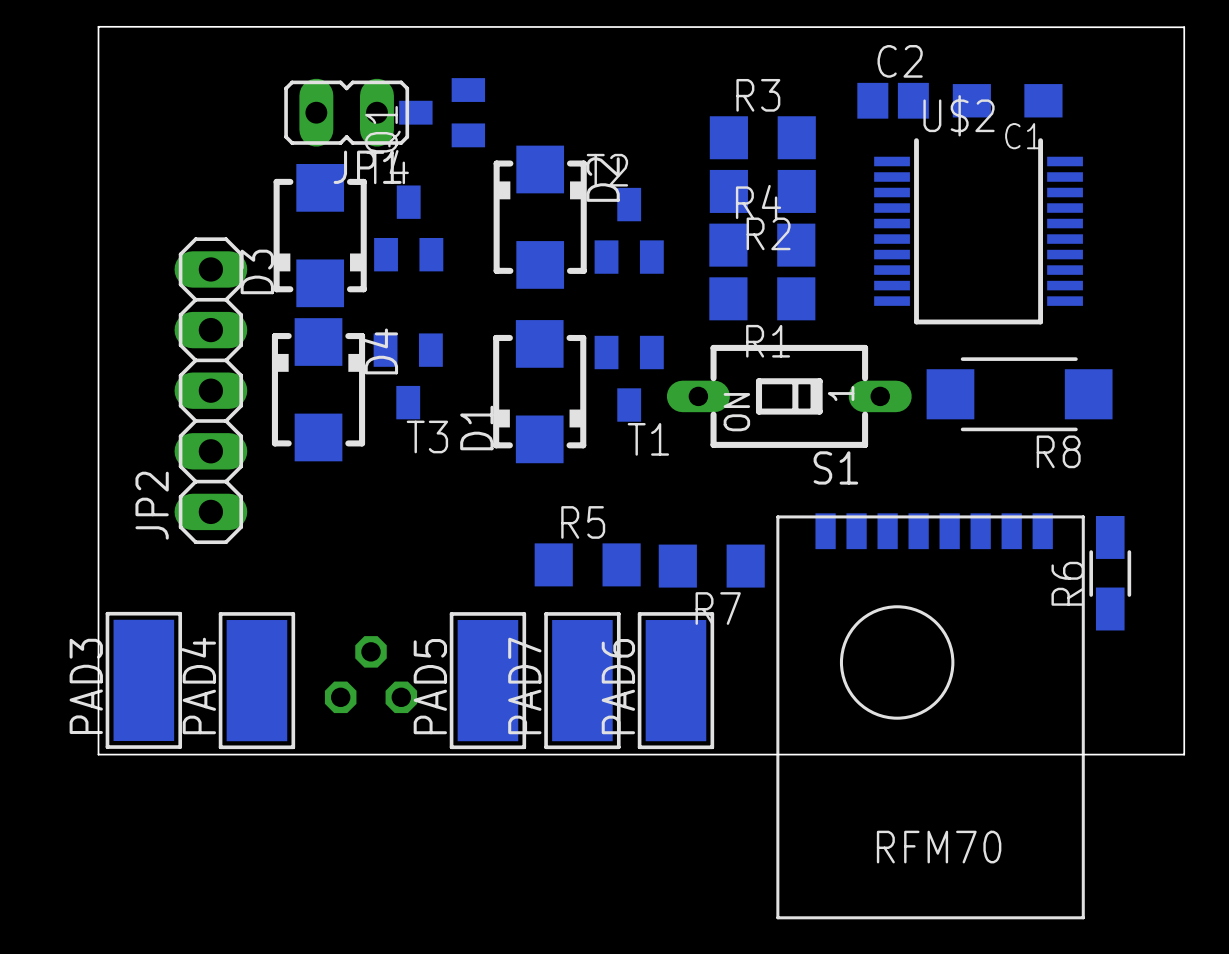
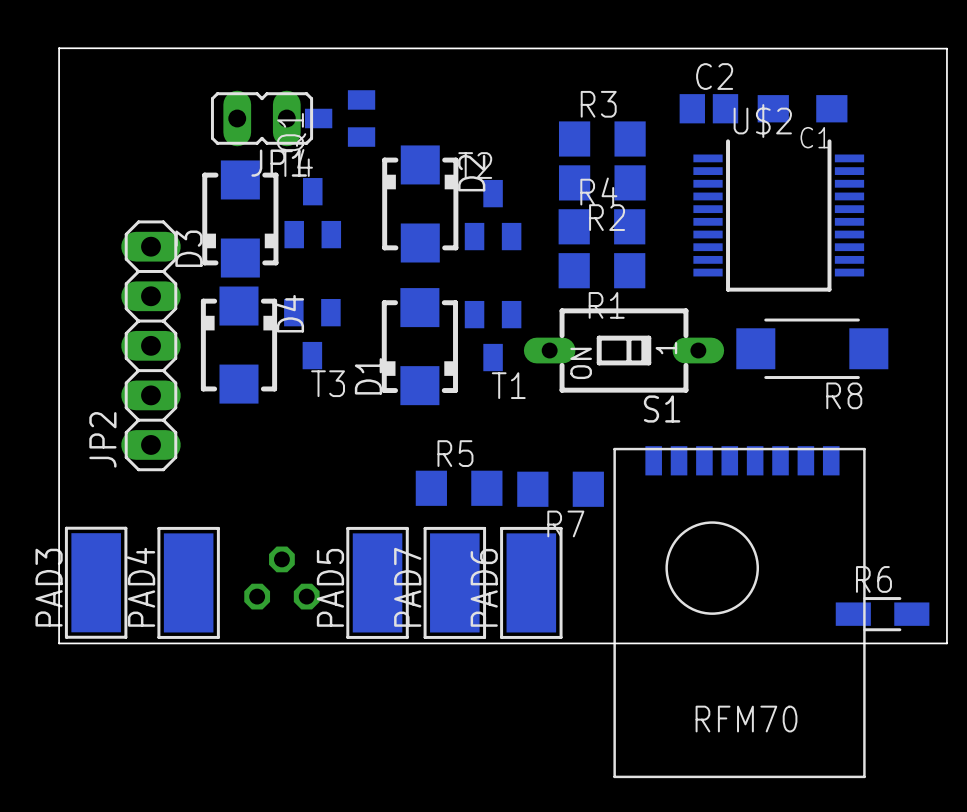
R6 rotation: 0° (1110, 573) -> 90° clockwise (882, 614)
R6 position: (1110, 573) -> (882, 614)

